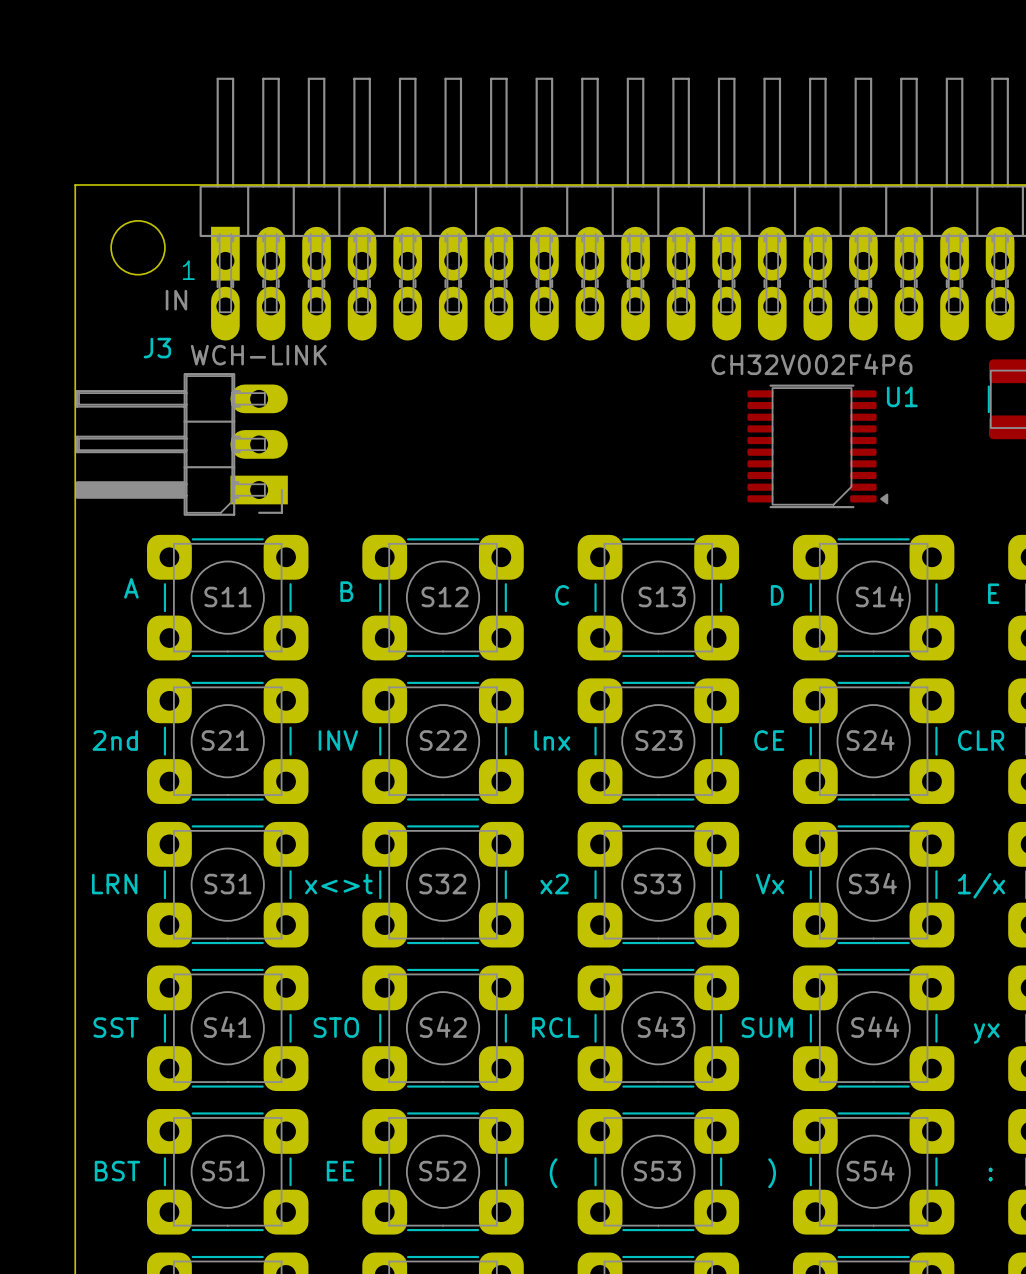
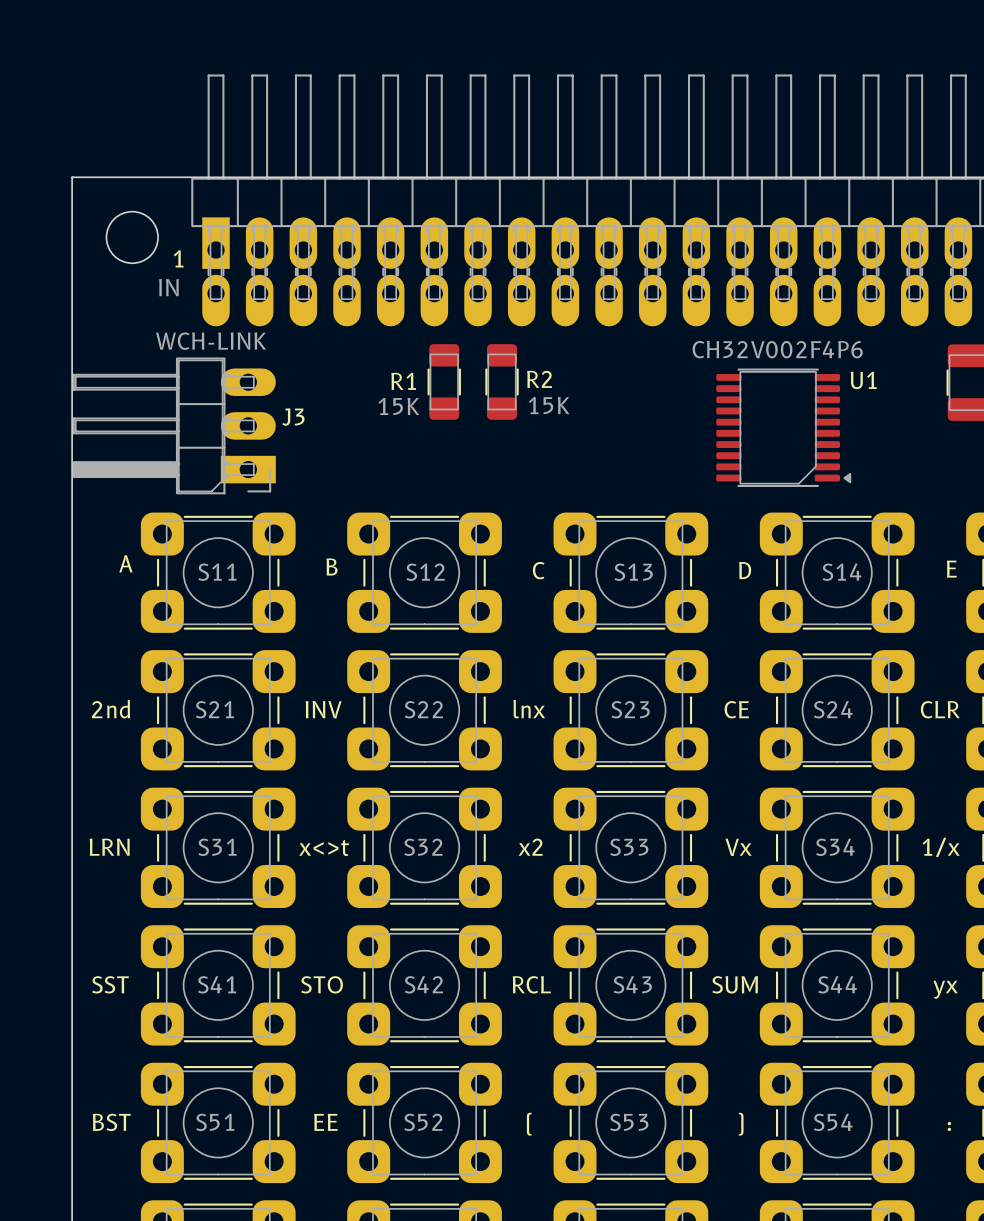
J3 name position: J3 (157, 348) -> J3 (293, 417)
J3 value position: WCH-LINK (258, 355) -> WCH-LINK (211, 341)
R1: none -> 15K (444, 381)
R2: none -> 15K (502, 381)

